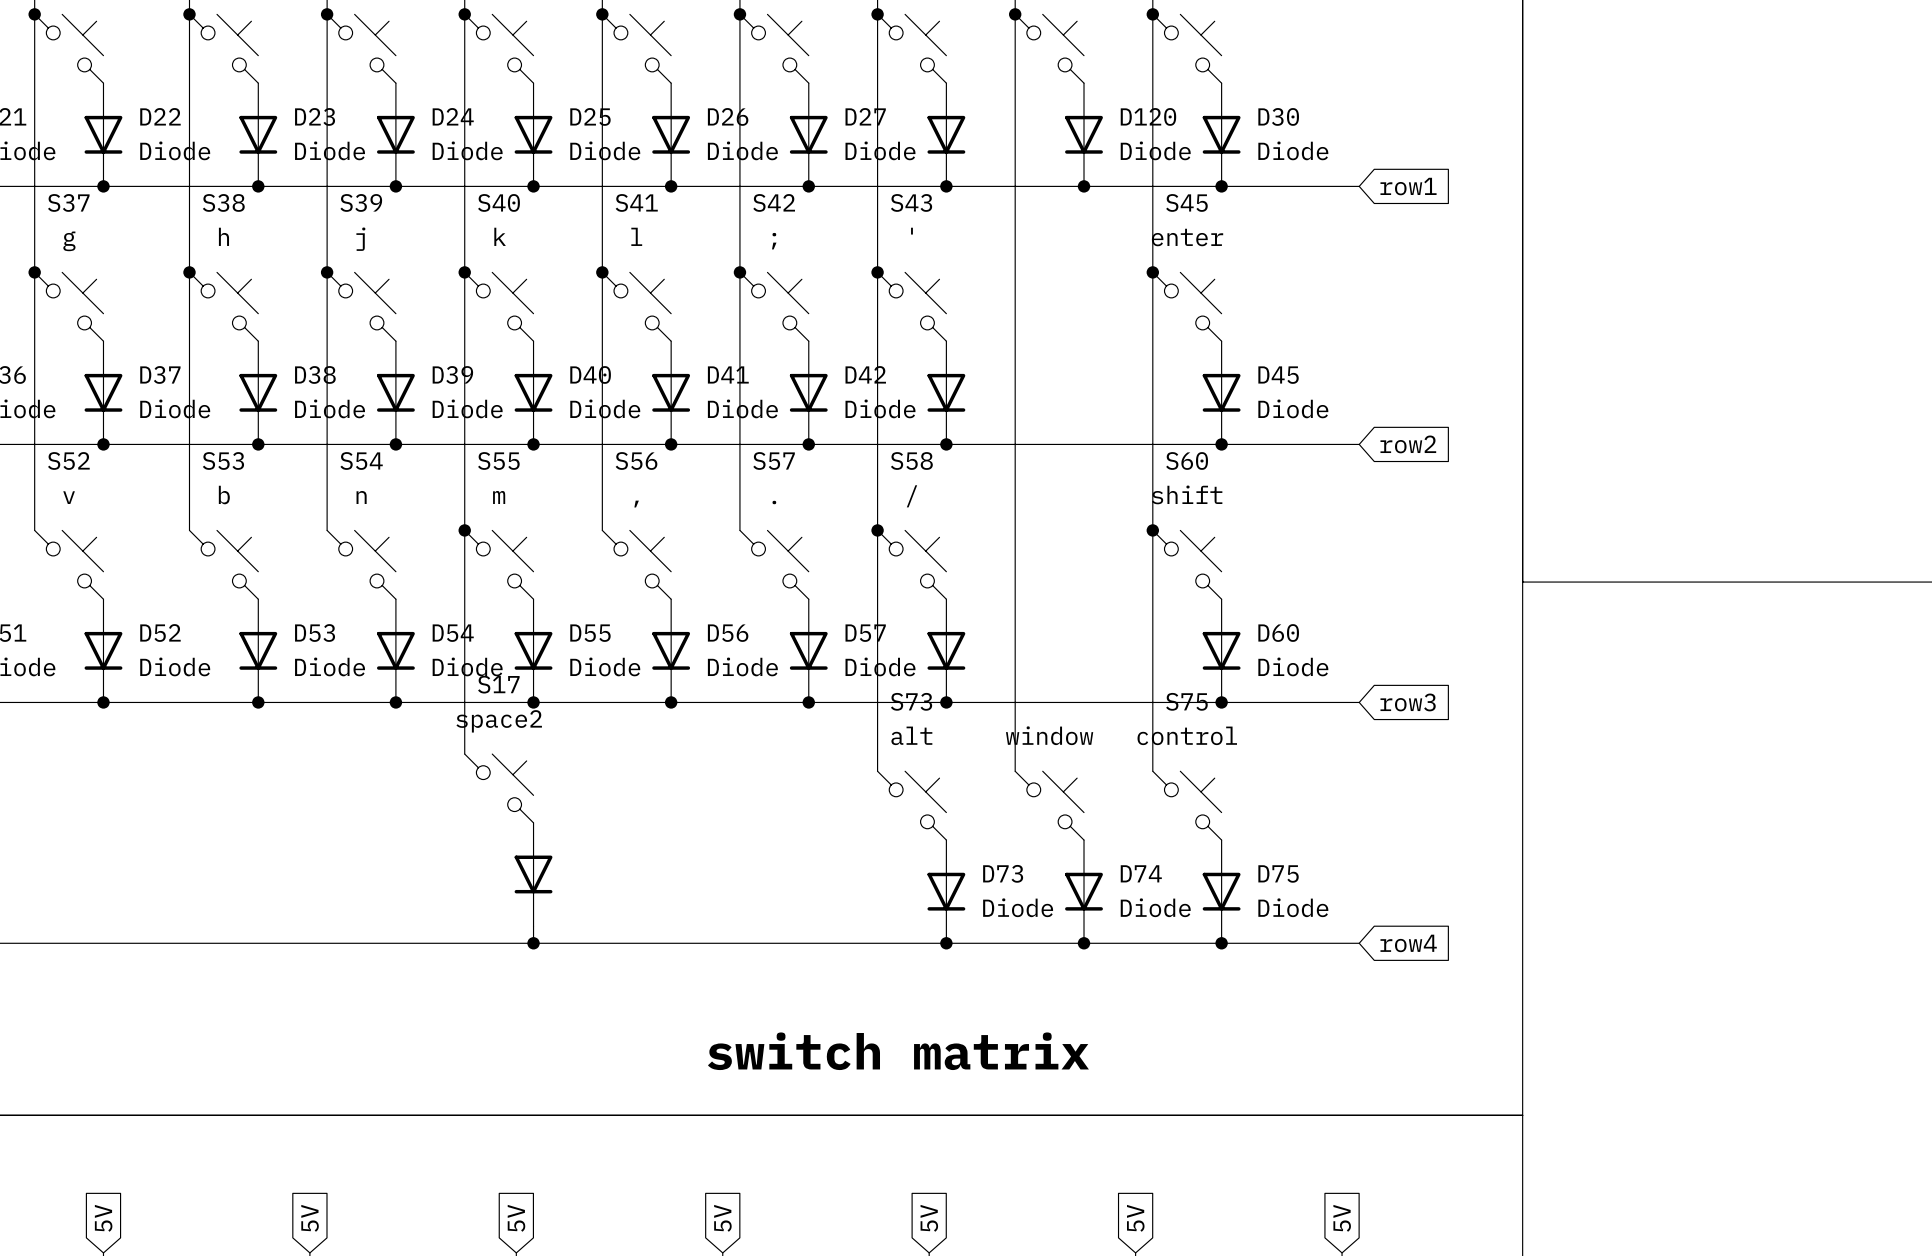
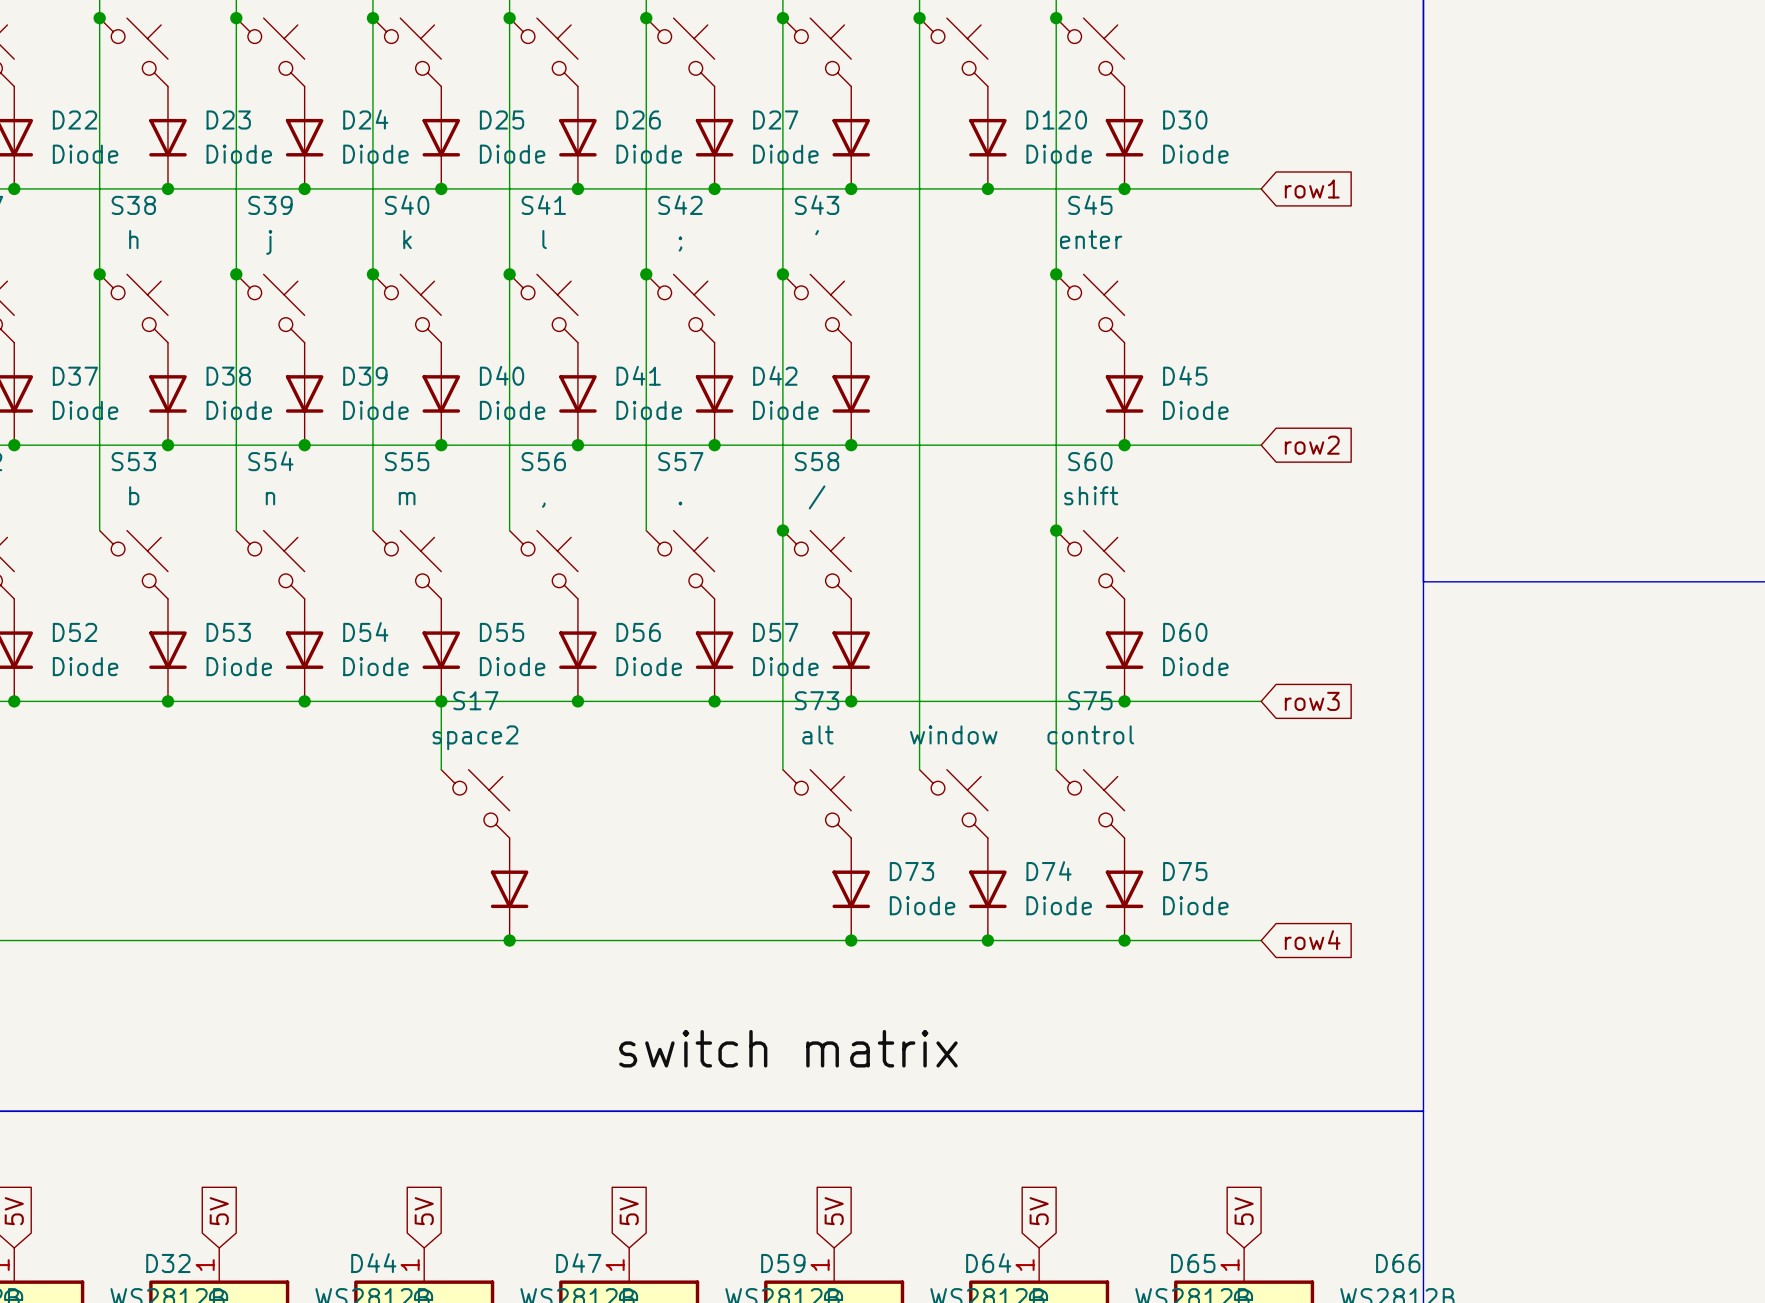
wire: (464, 530) (464, 754) -> none
junction: (464, 530) -> none
wire: none -> (441, 701) (441, 769)
S17 position: (499, 788) -> (475, 803)
part position: (533, 874) -> (509, 889)
wire: (533, 926) (533, 943) -> none
junction position: (533, 943) -> (509, 940)

